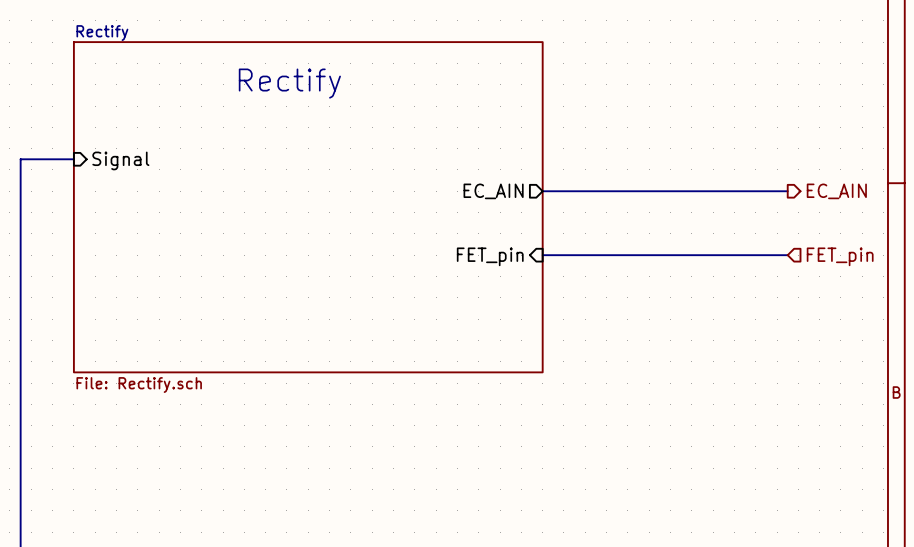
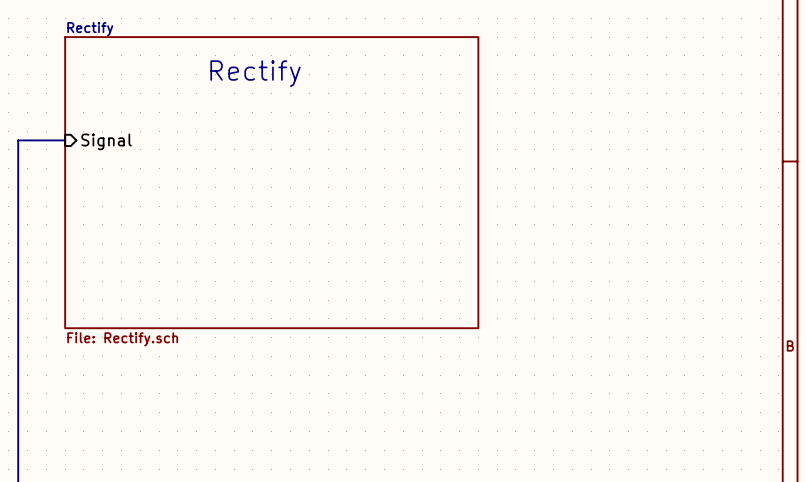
sheet pin: EC_AIN (493, 191) -> none
wire: (542, 191) (787, 191) -> none
hierarchical label: EC_AIN (836, 191) -> none
wire: (542, 255) (787, 255) -> none
sheet pin: FET_pin (490, 256) -> none
hierarchical label: FET_pin (840, 256) -> none

